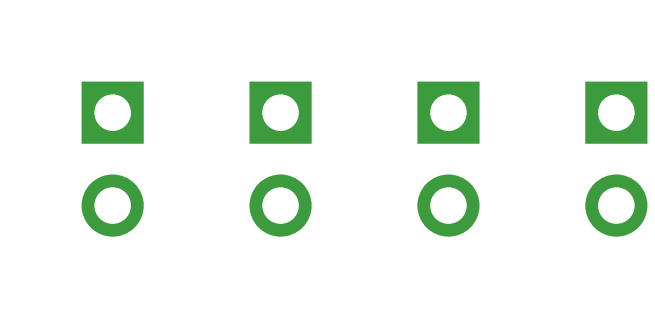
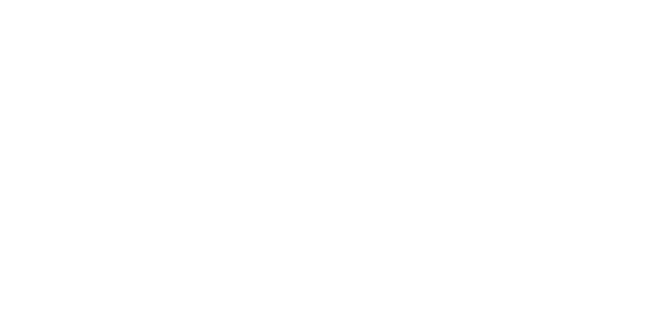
part: (112, 159) -> none
part: (280, 159) -> none
part: (448, 159) -> none
part: (616, 159) -> none

